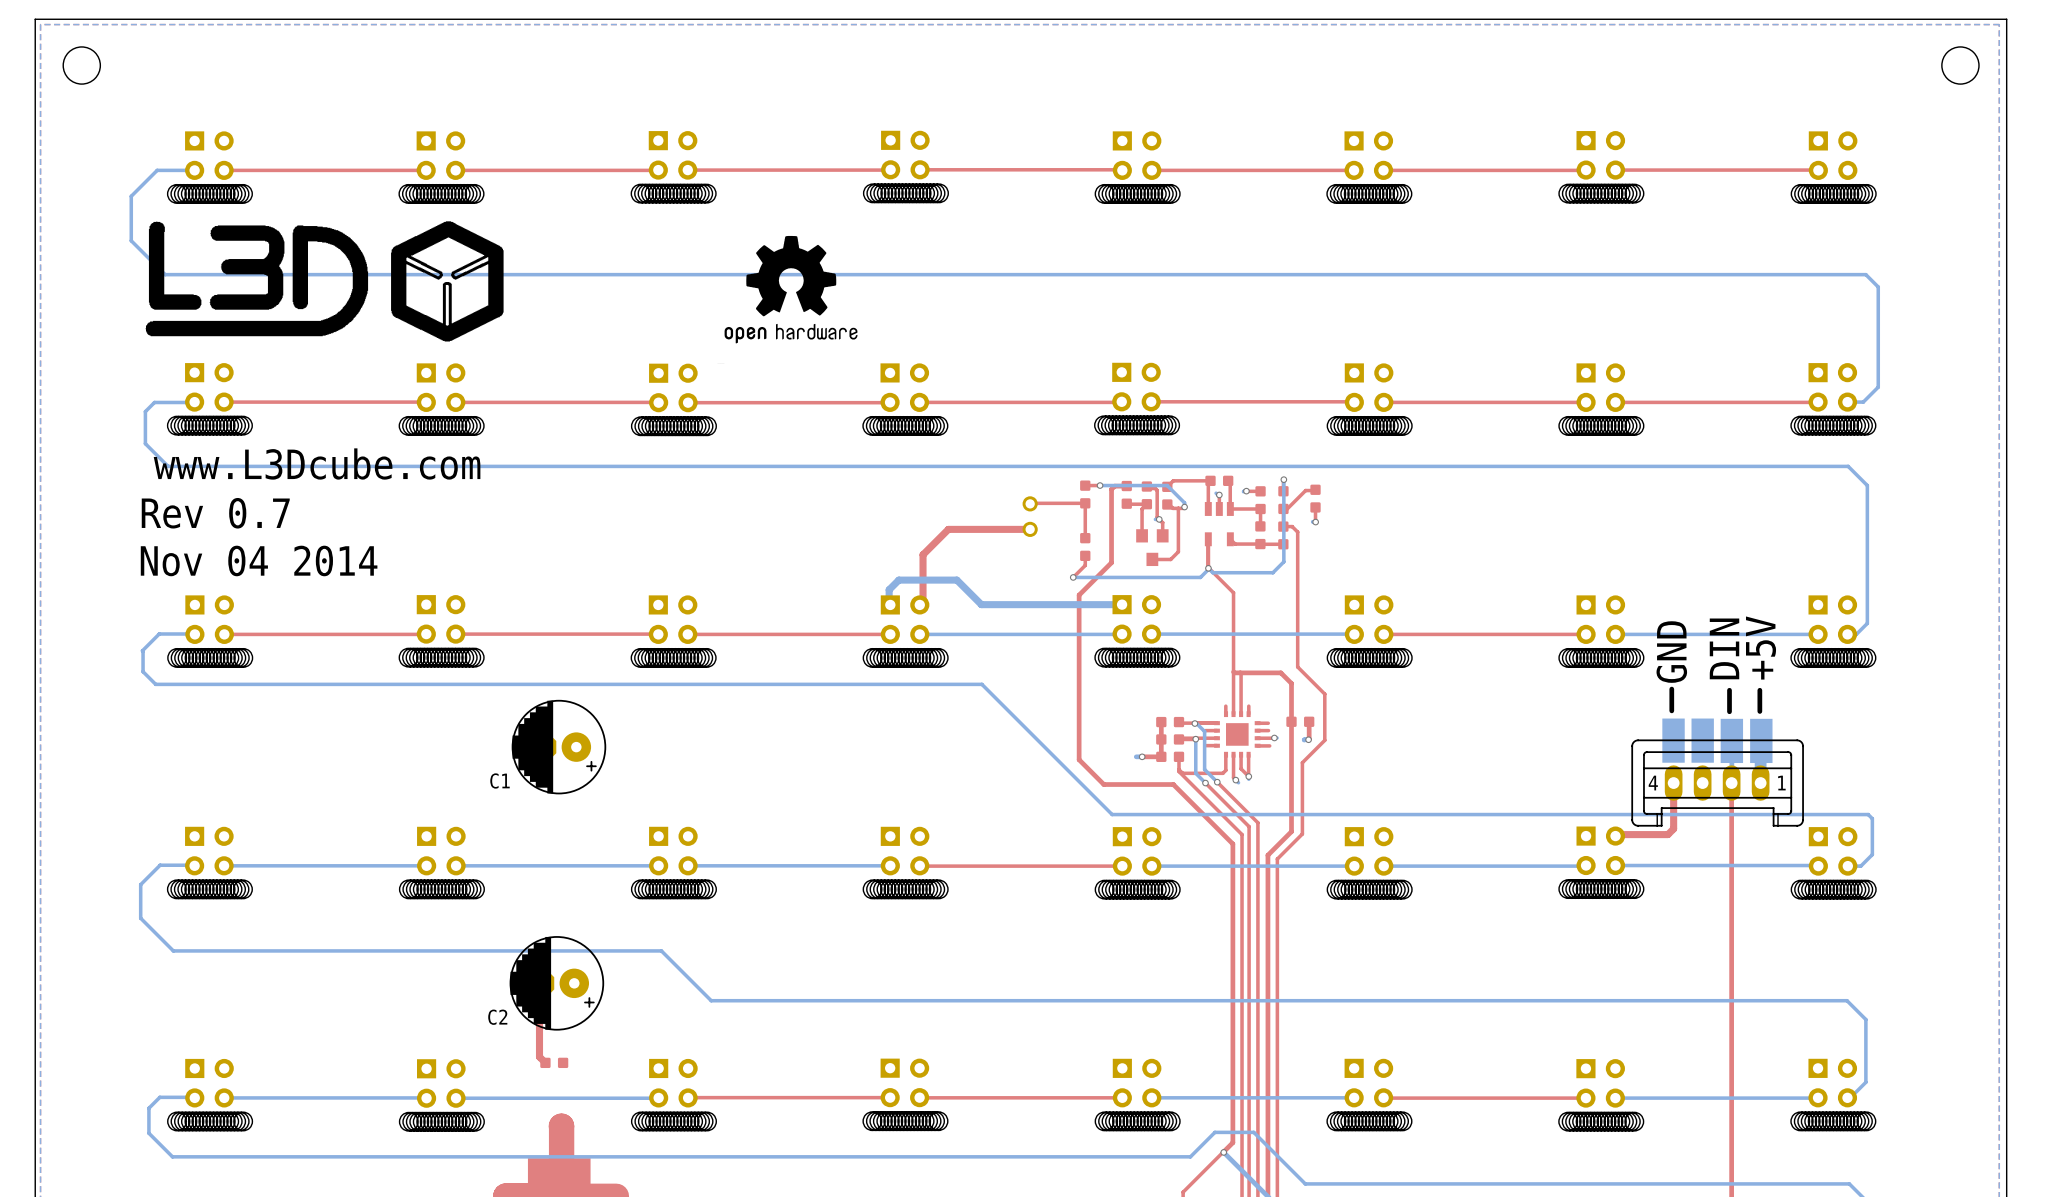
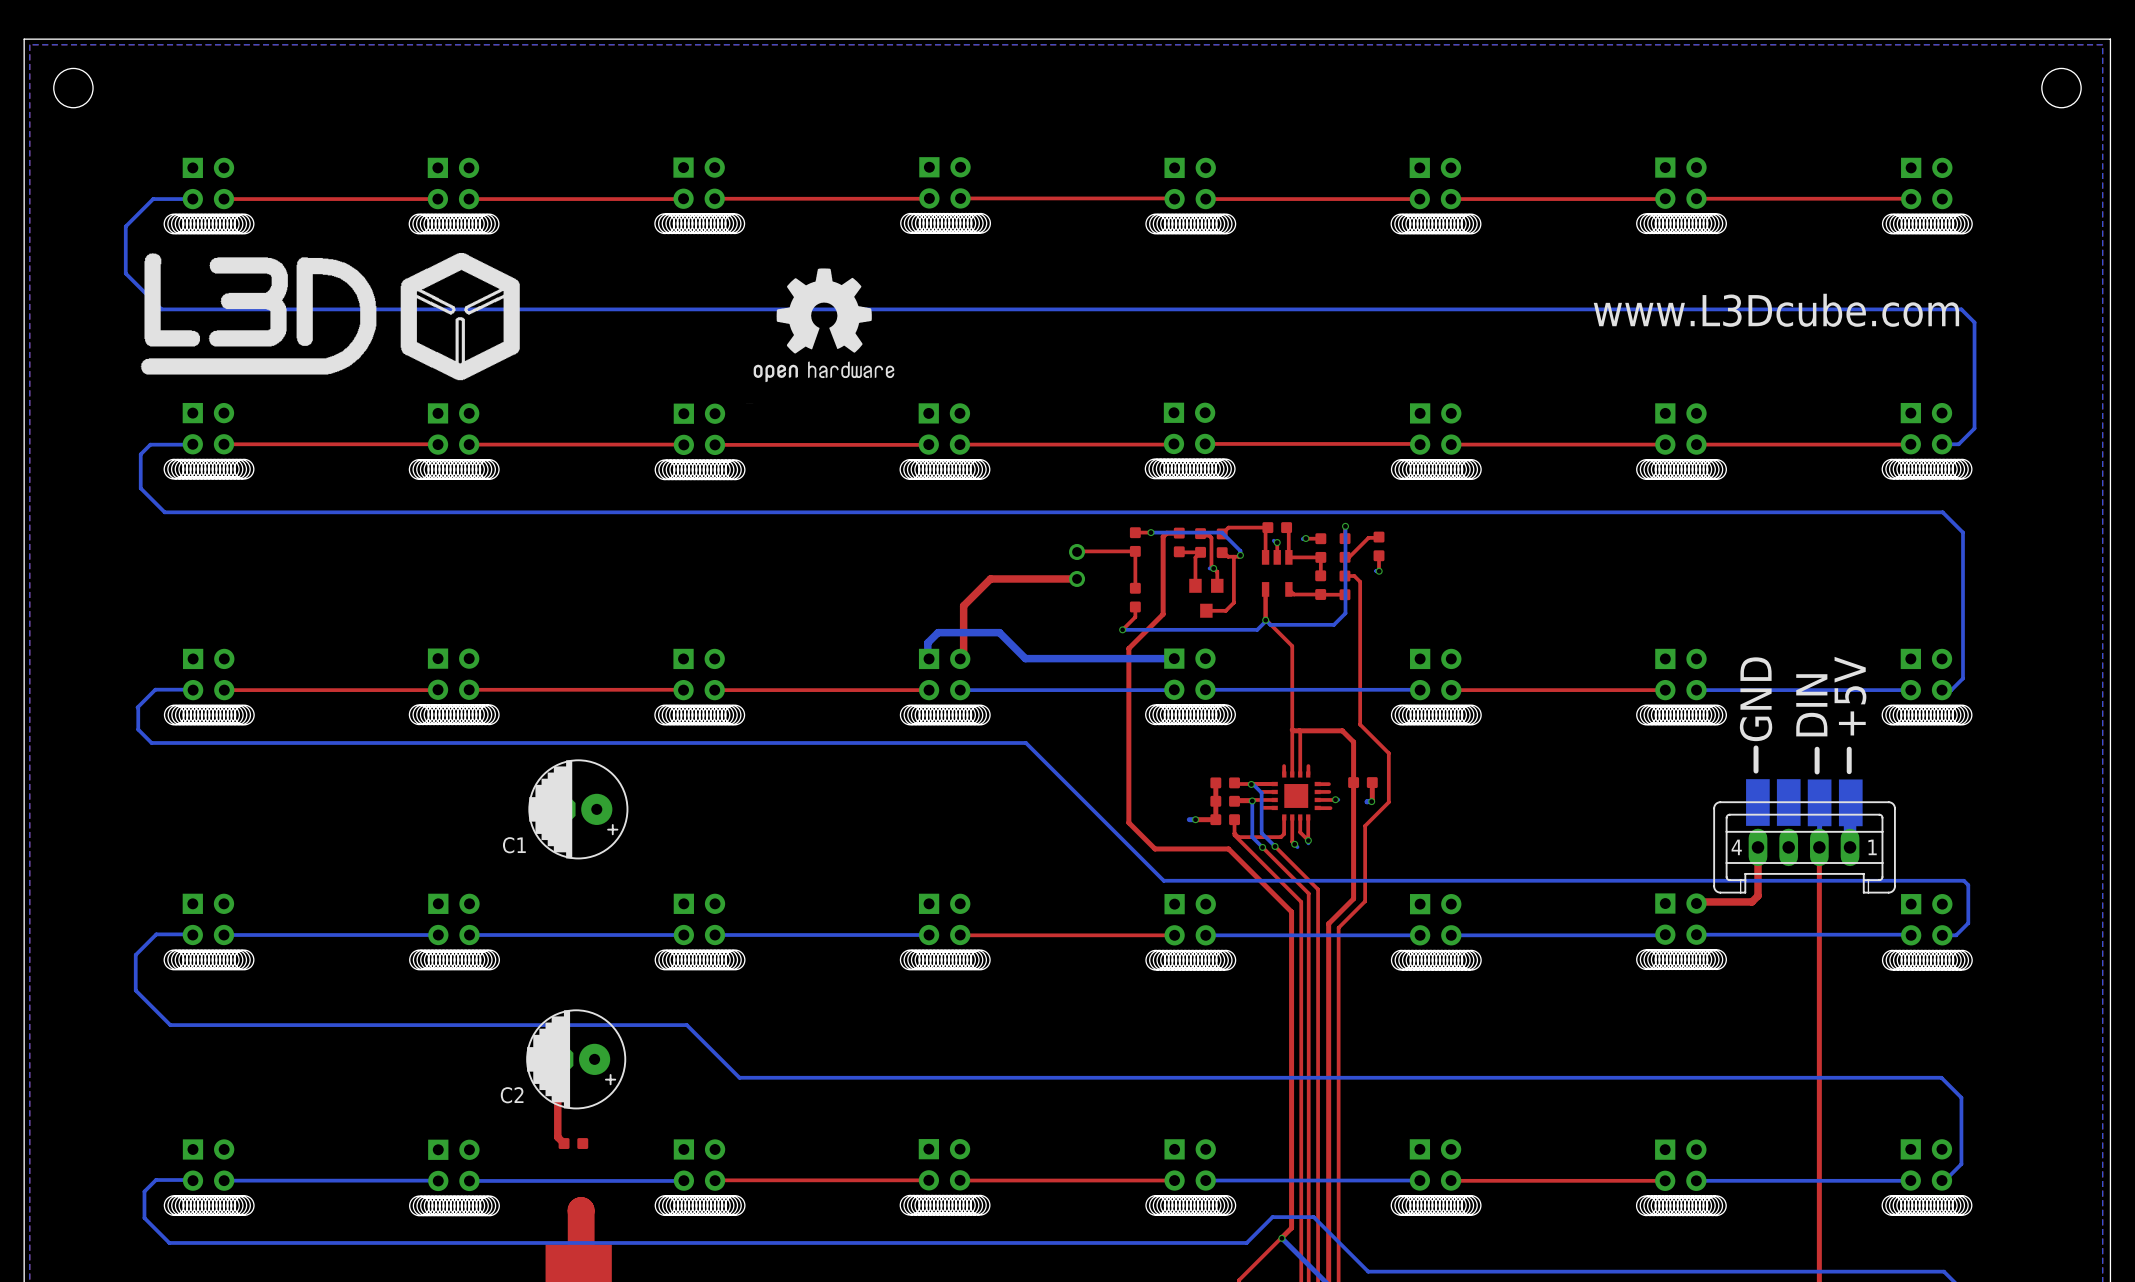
text: none -> www.L3Dcube.com (1776, 310)
text: www.L3Dcube.com (317, 464) -> none
text: Rev 0.7 (215, 513) -> none
text: Nov 04 2014 (259, 560) -> none

